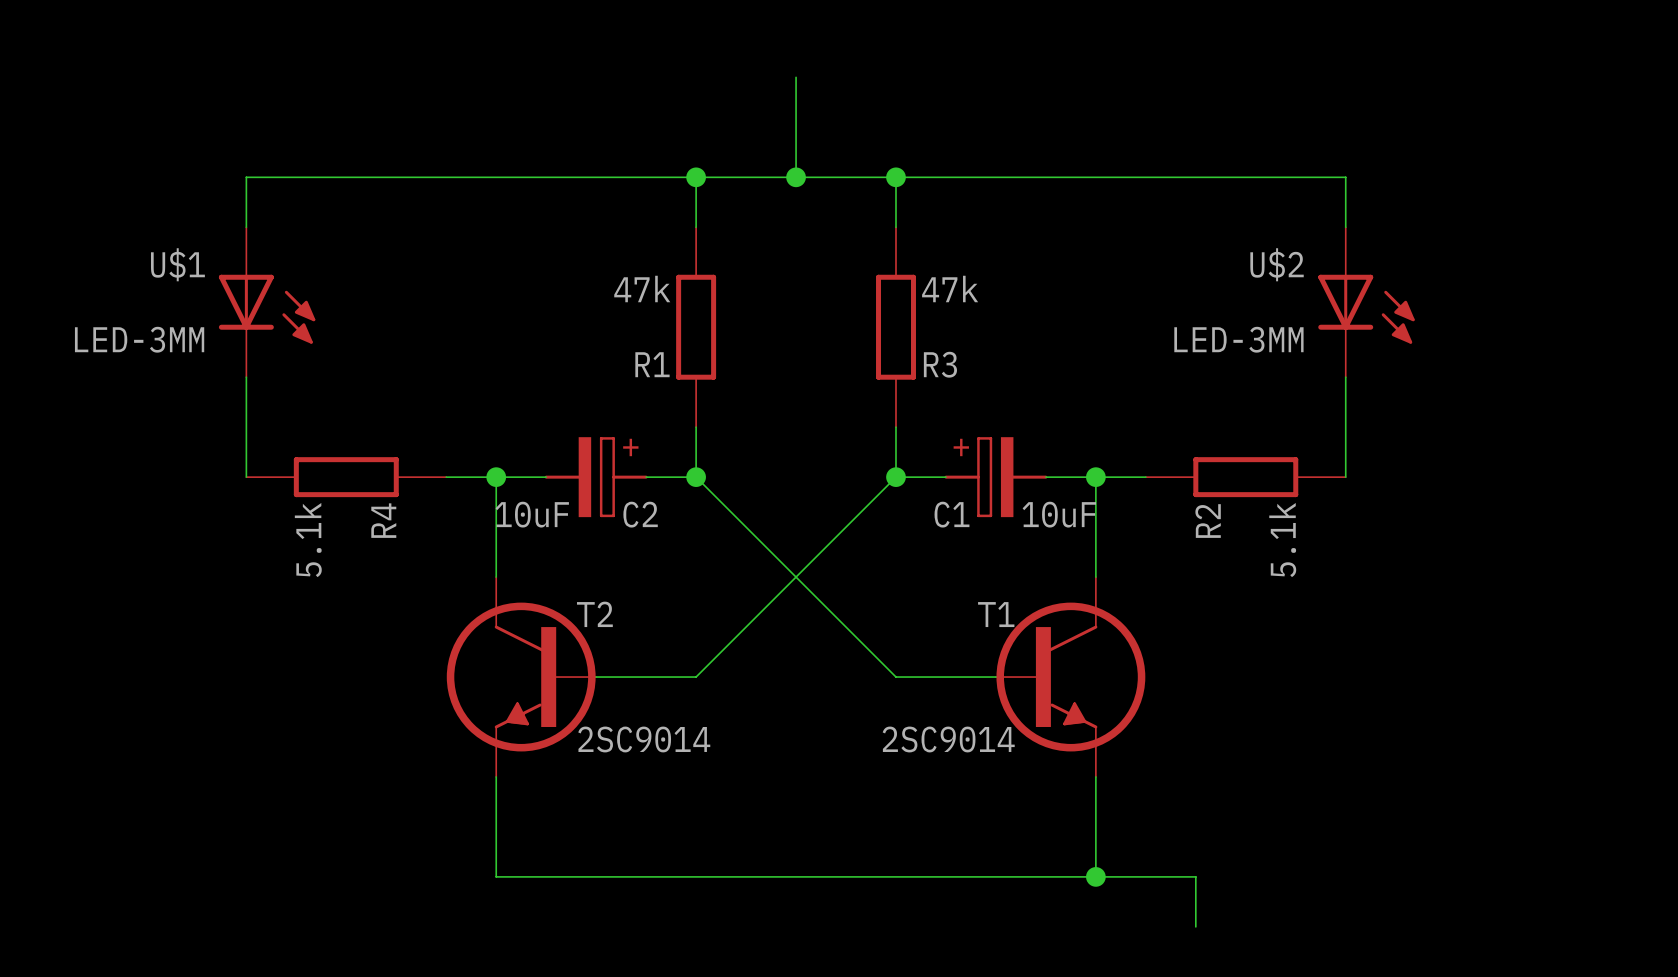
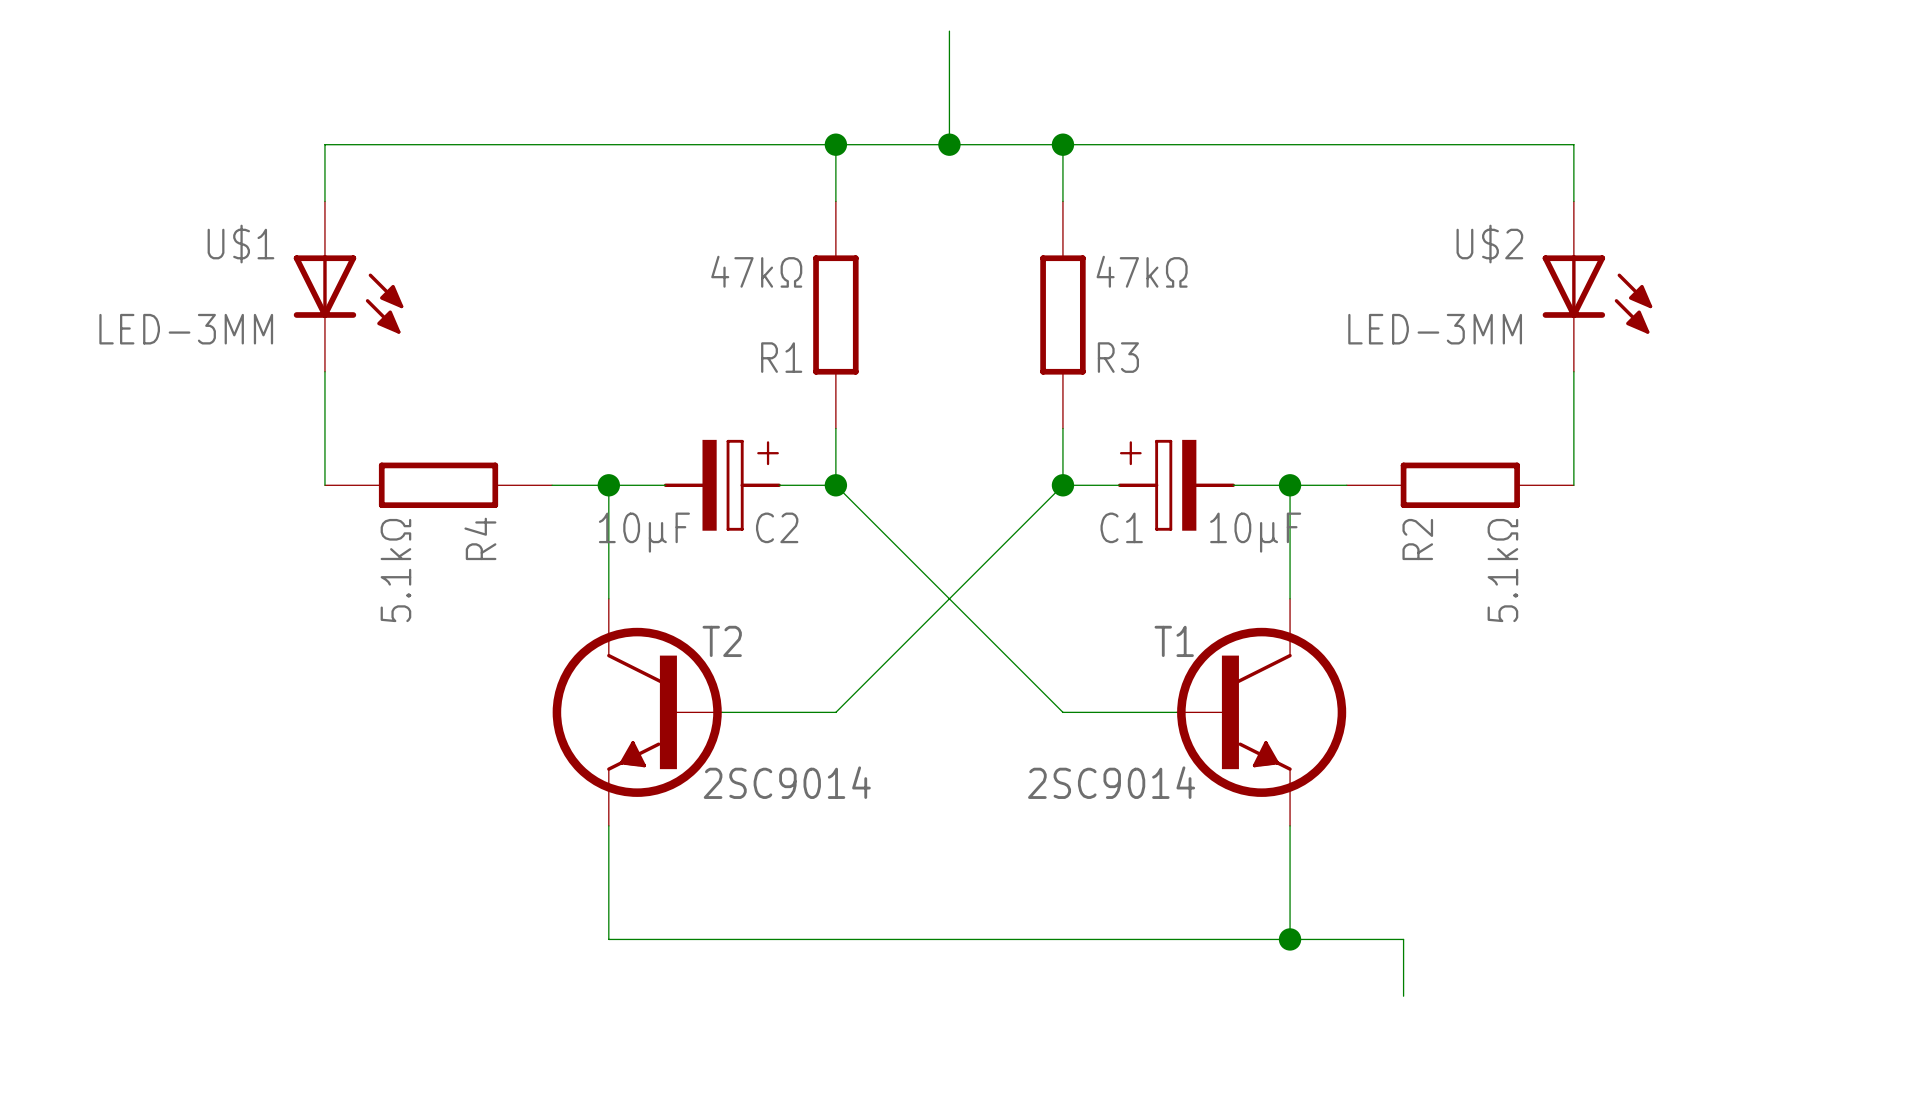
R1 value: 47k (642, 289) -> 47kΩ (756, 271)
R3 value: 47k (950, 289) -> 47kΩ (1142, 271)
C2 value: 10uF (532, 514) -> 10μF (644, 532)
C1 value: 10uF (1059, 514) -> 10μF (1255, 532)
R4 value: 5.1k (308, 540) -> 5.1kΩ (395, 570)
R2 value: 5.1k (1282, 540) -> 5.1kΩ (1502, 570)

